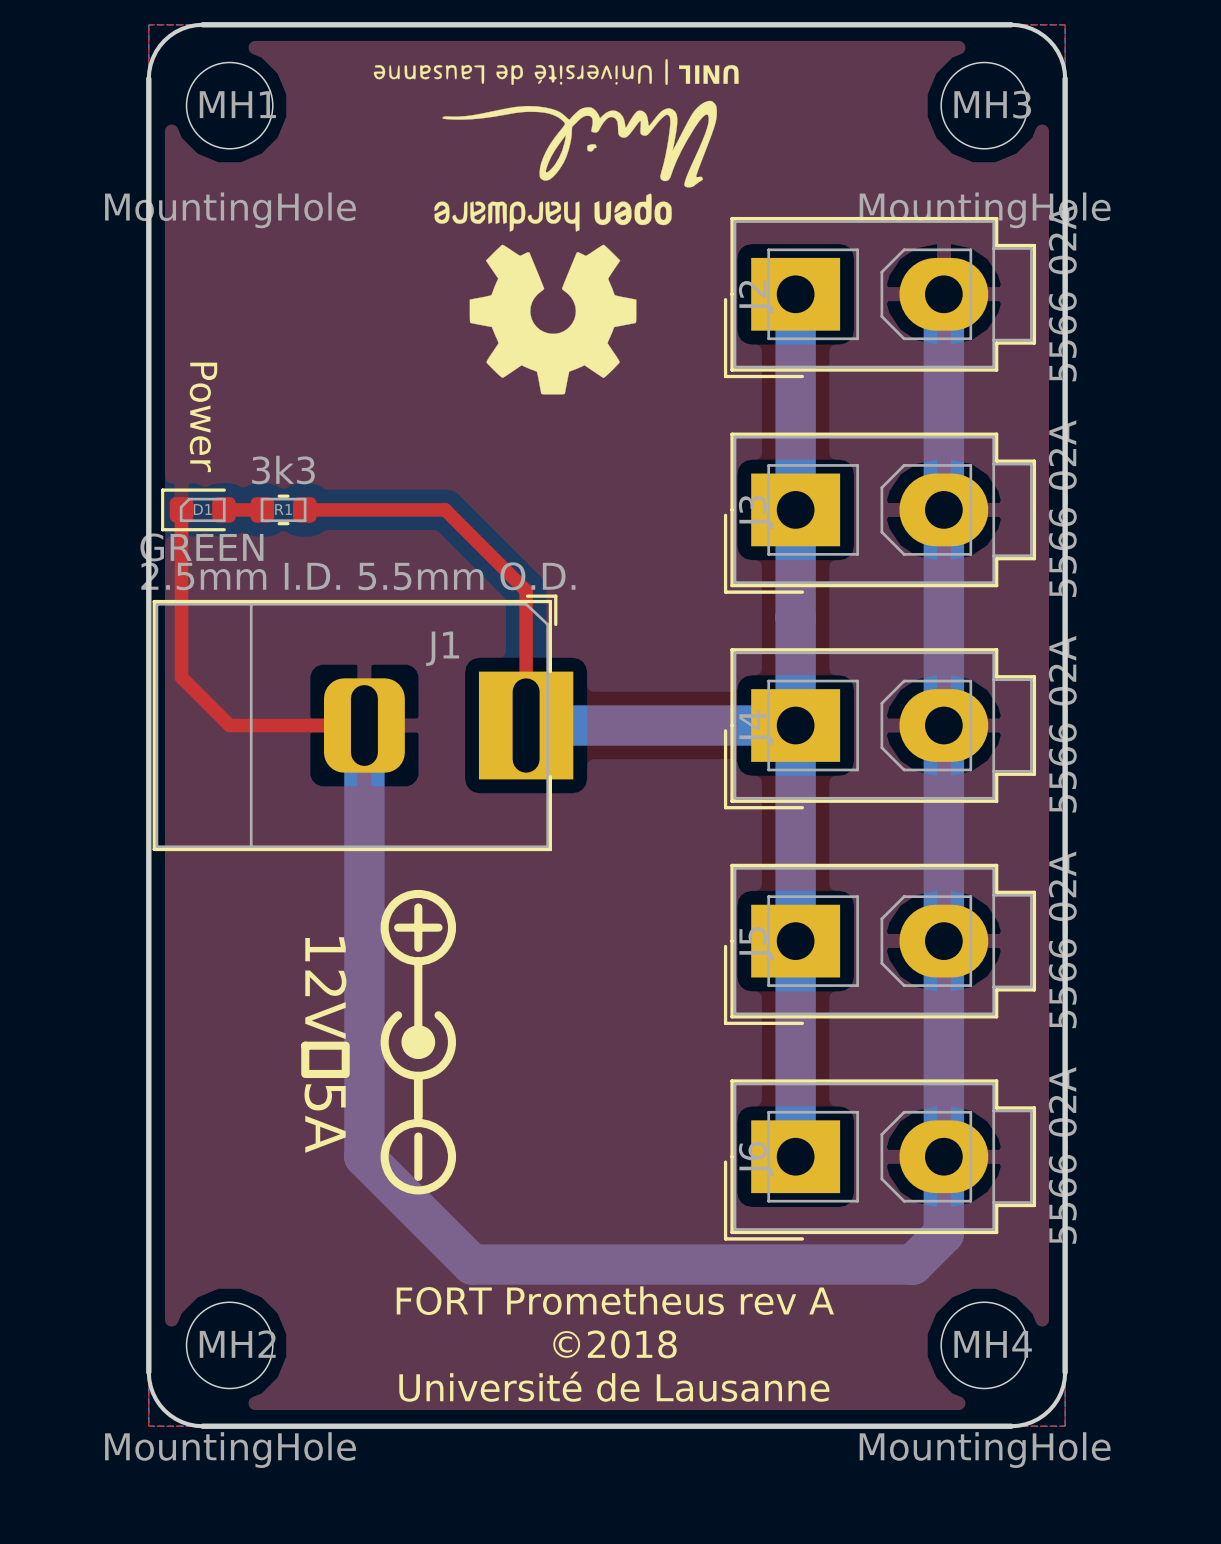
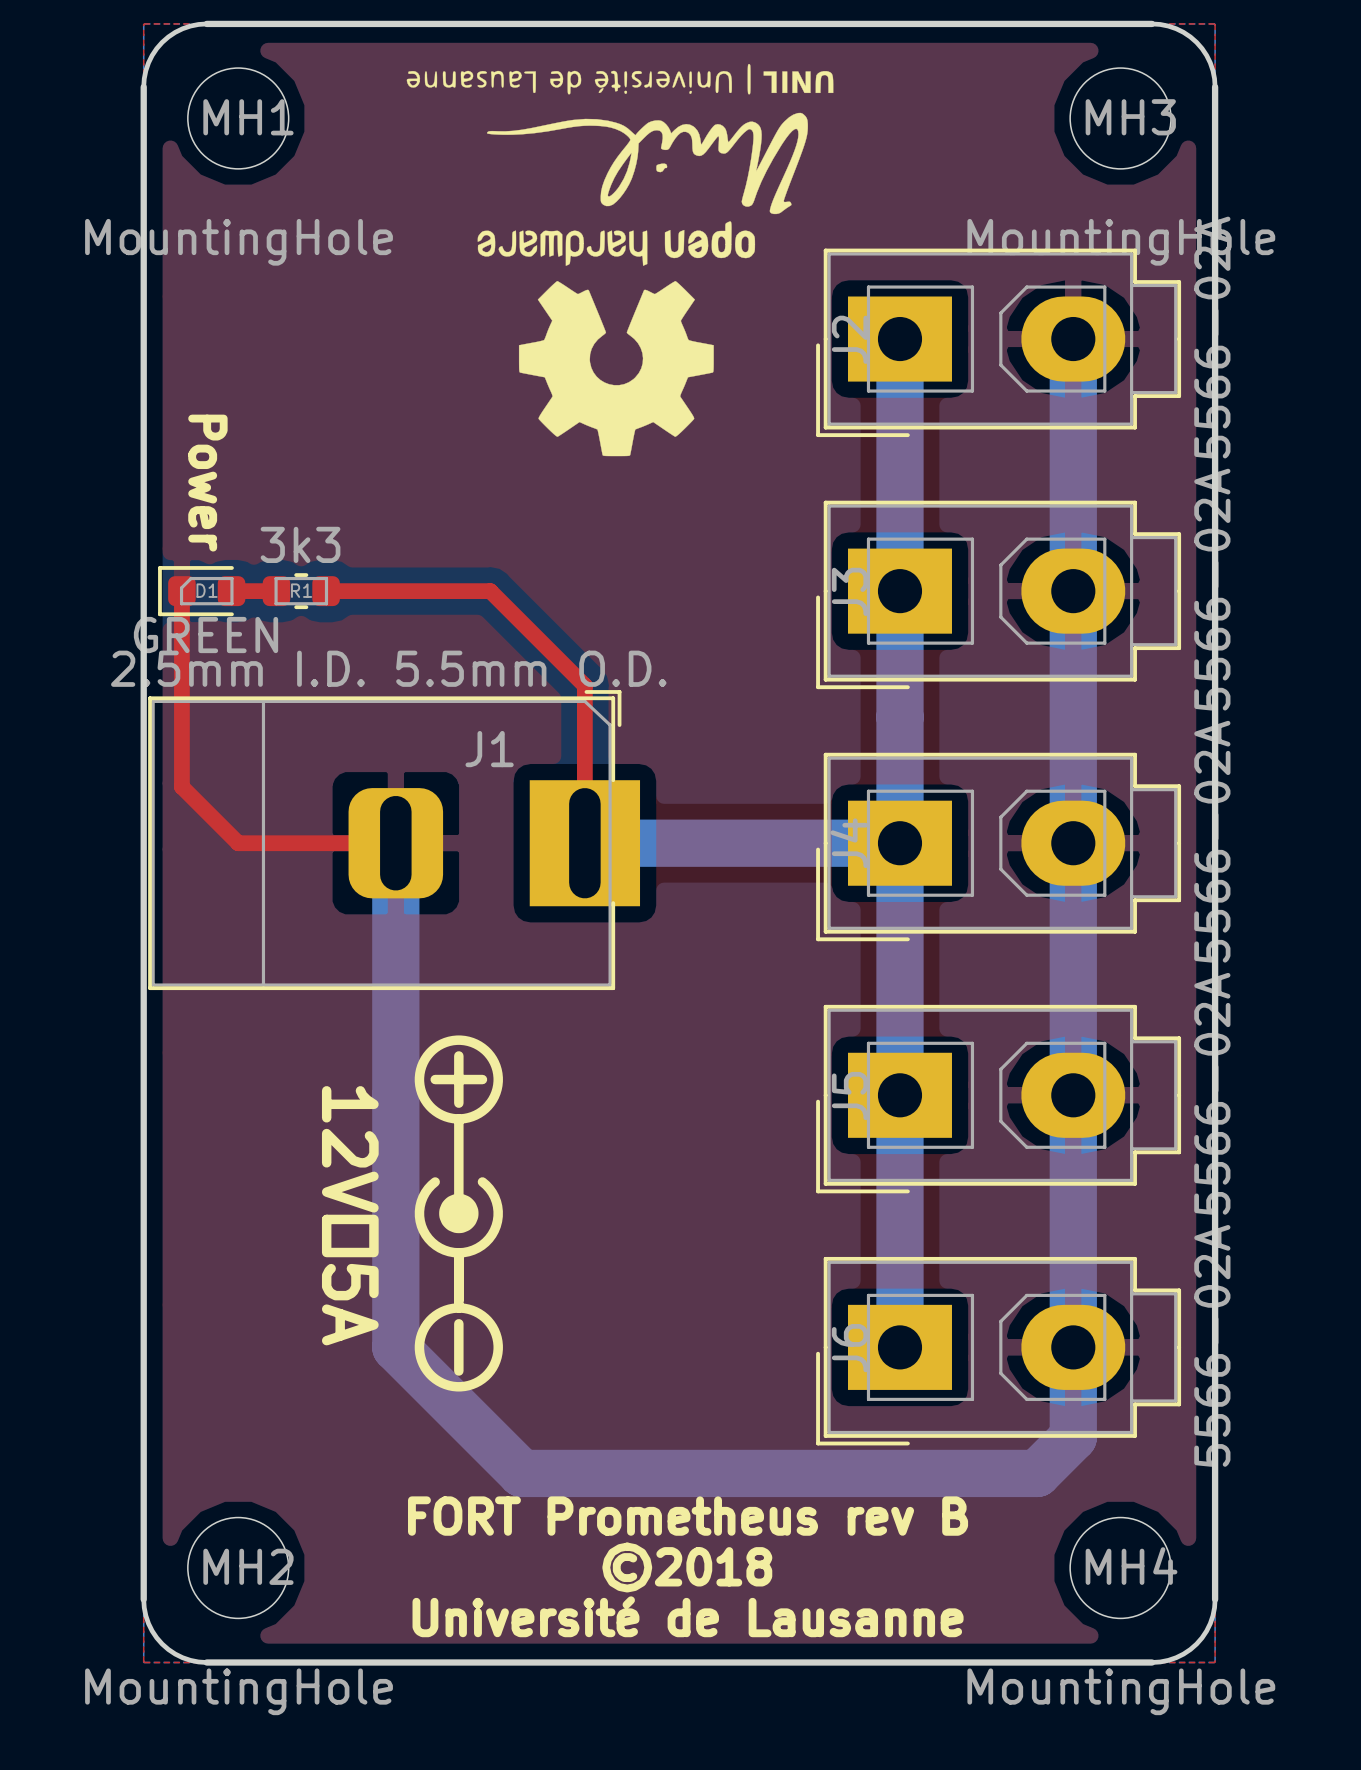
text: FORT Prometheus rev A (615, 1300) -> FORT Prometheus rev B (688, 1516)

